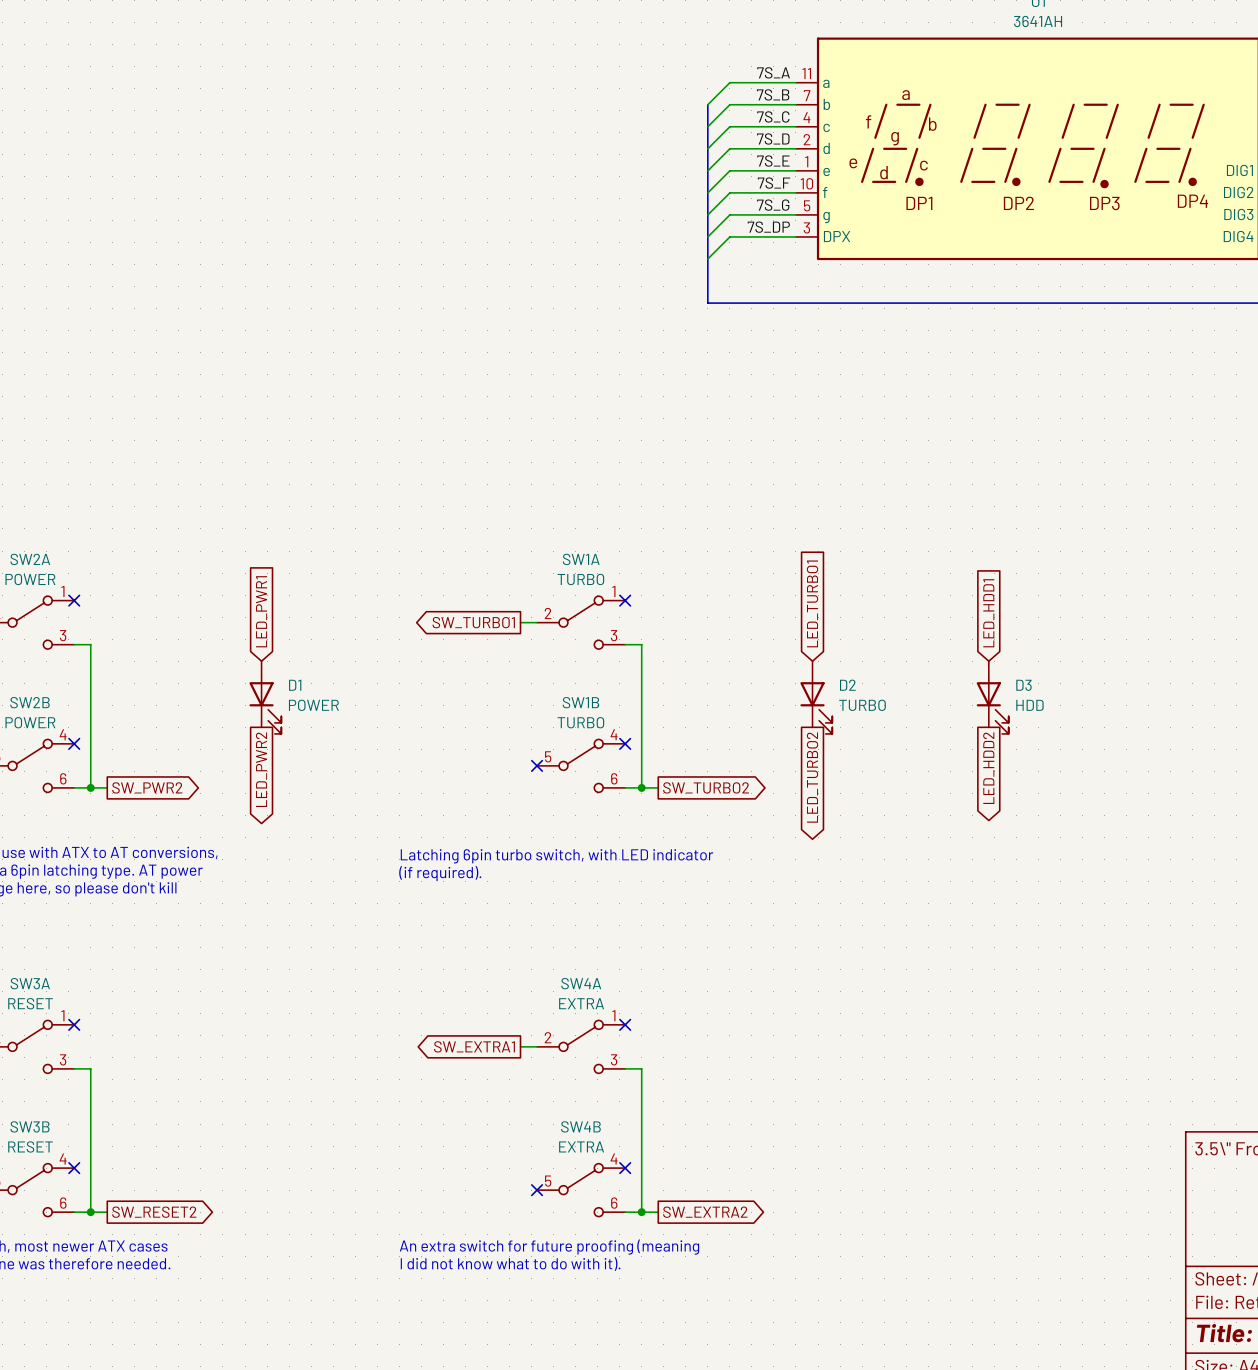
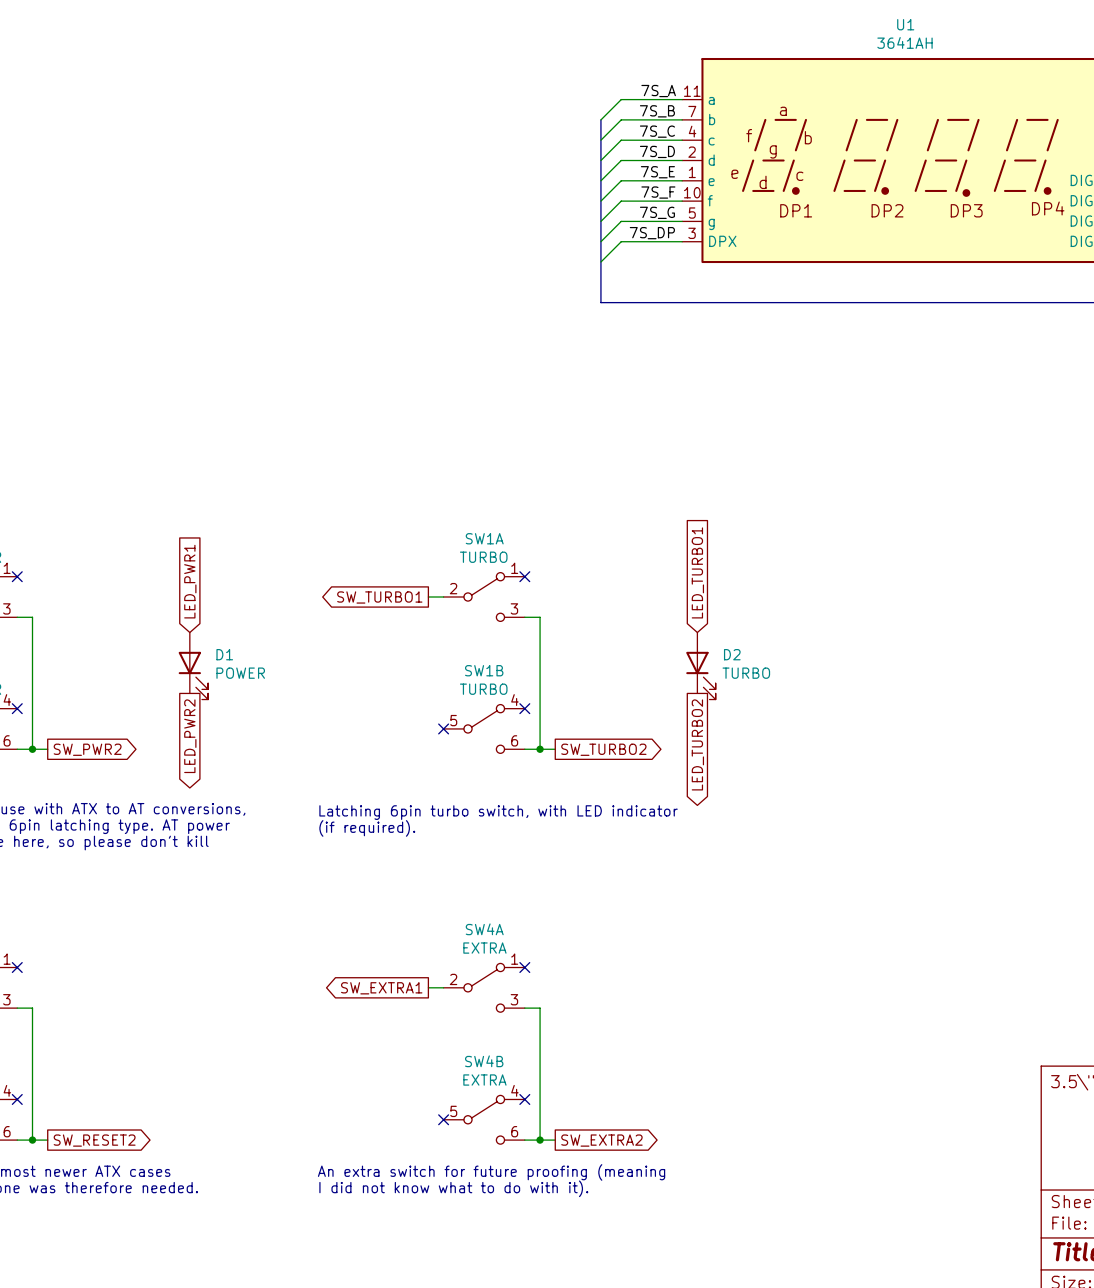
global label: LED_HDD1 (988, 613) -> none
D3: HDD (992, 697) -> none
global label: LED_HDD2 (988, 768) -> none

